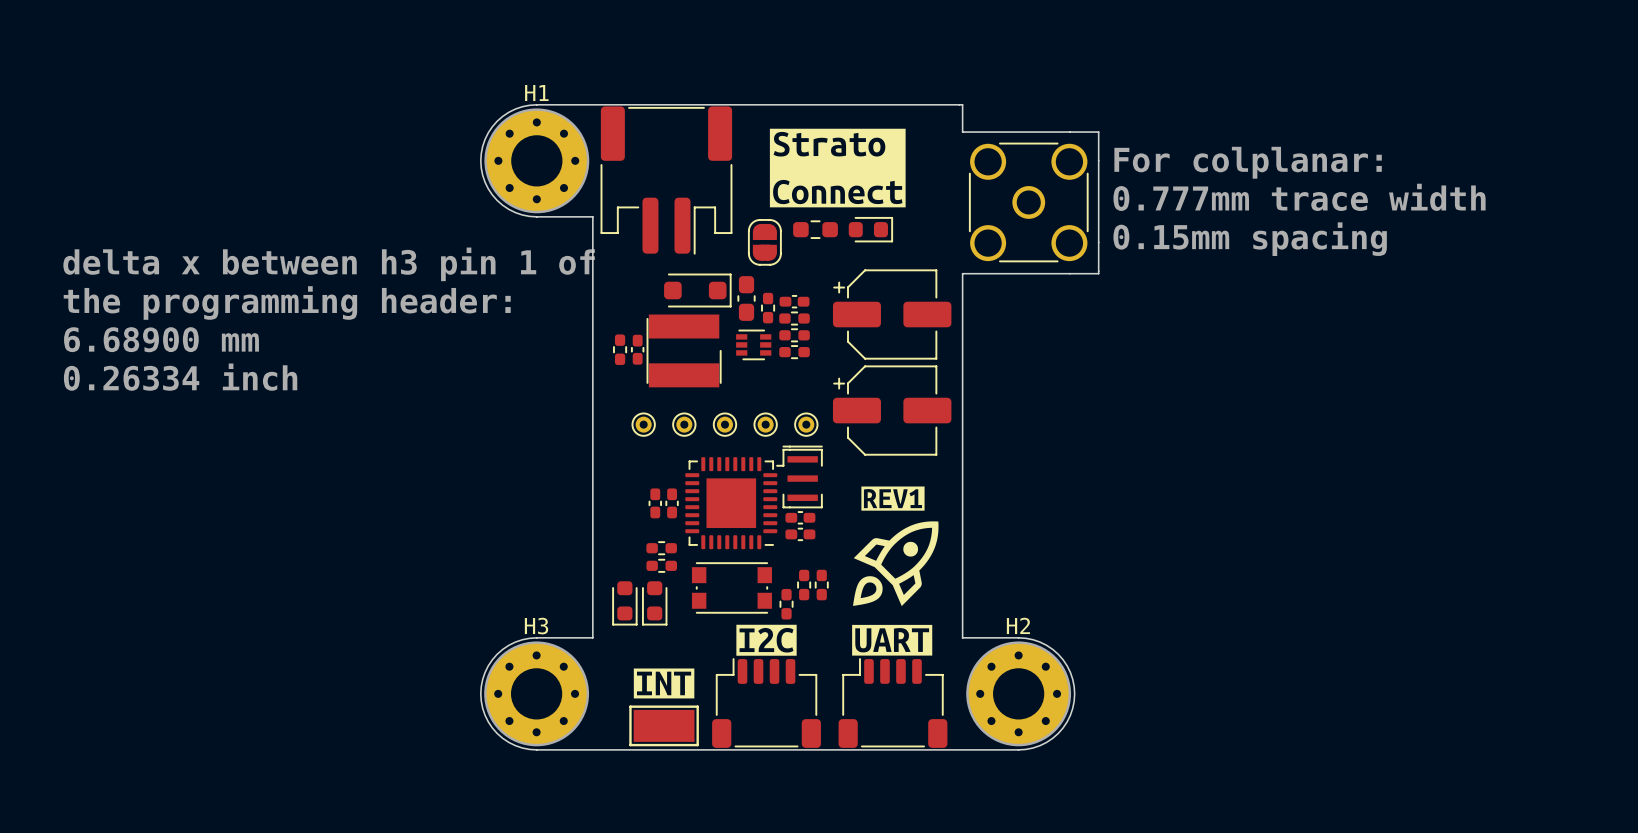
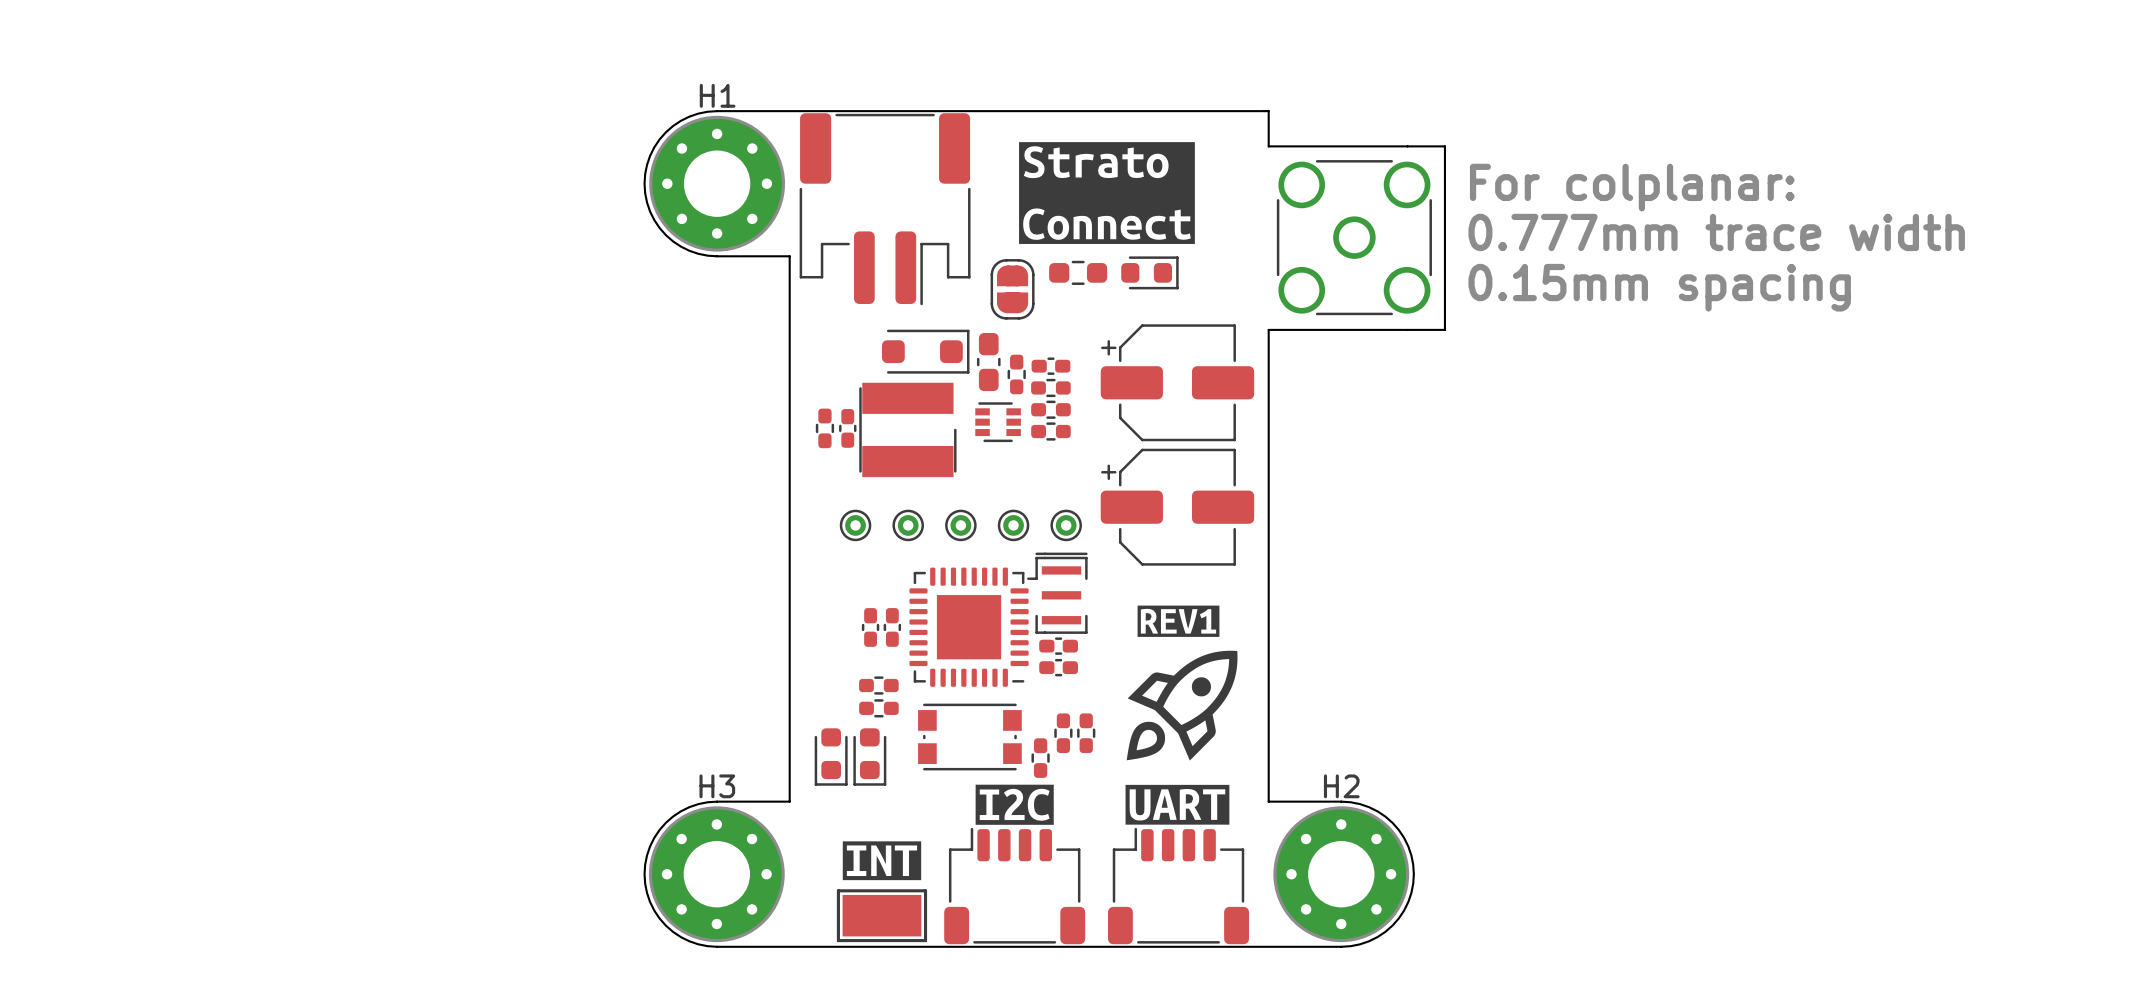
text: delta x between h3 pin 1 of (329, 264) -> none
text: the programming header: (287, 303) -> none
text: 6.68900 mm (161, 339) -> none
text: 0.26334 inch (180, 377) -> none

